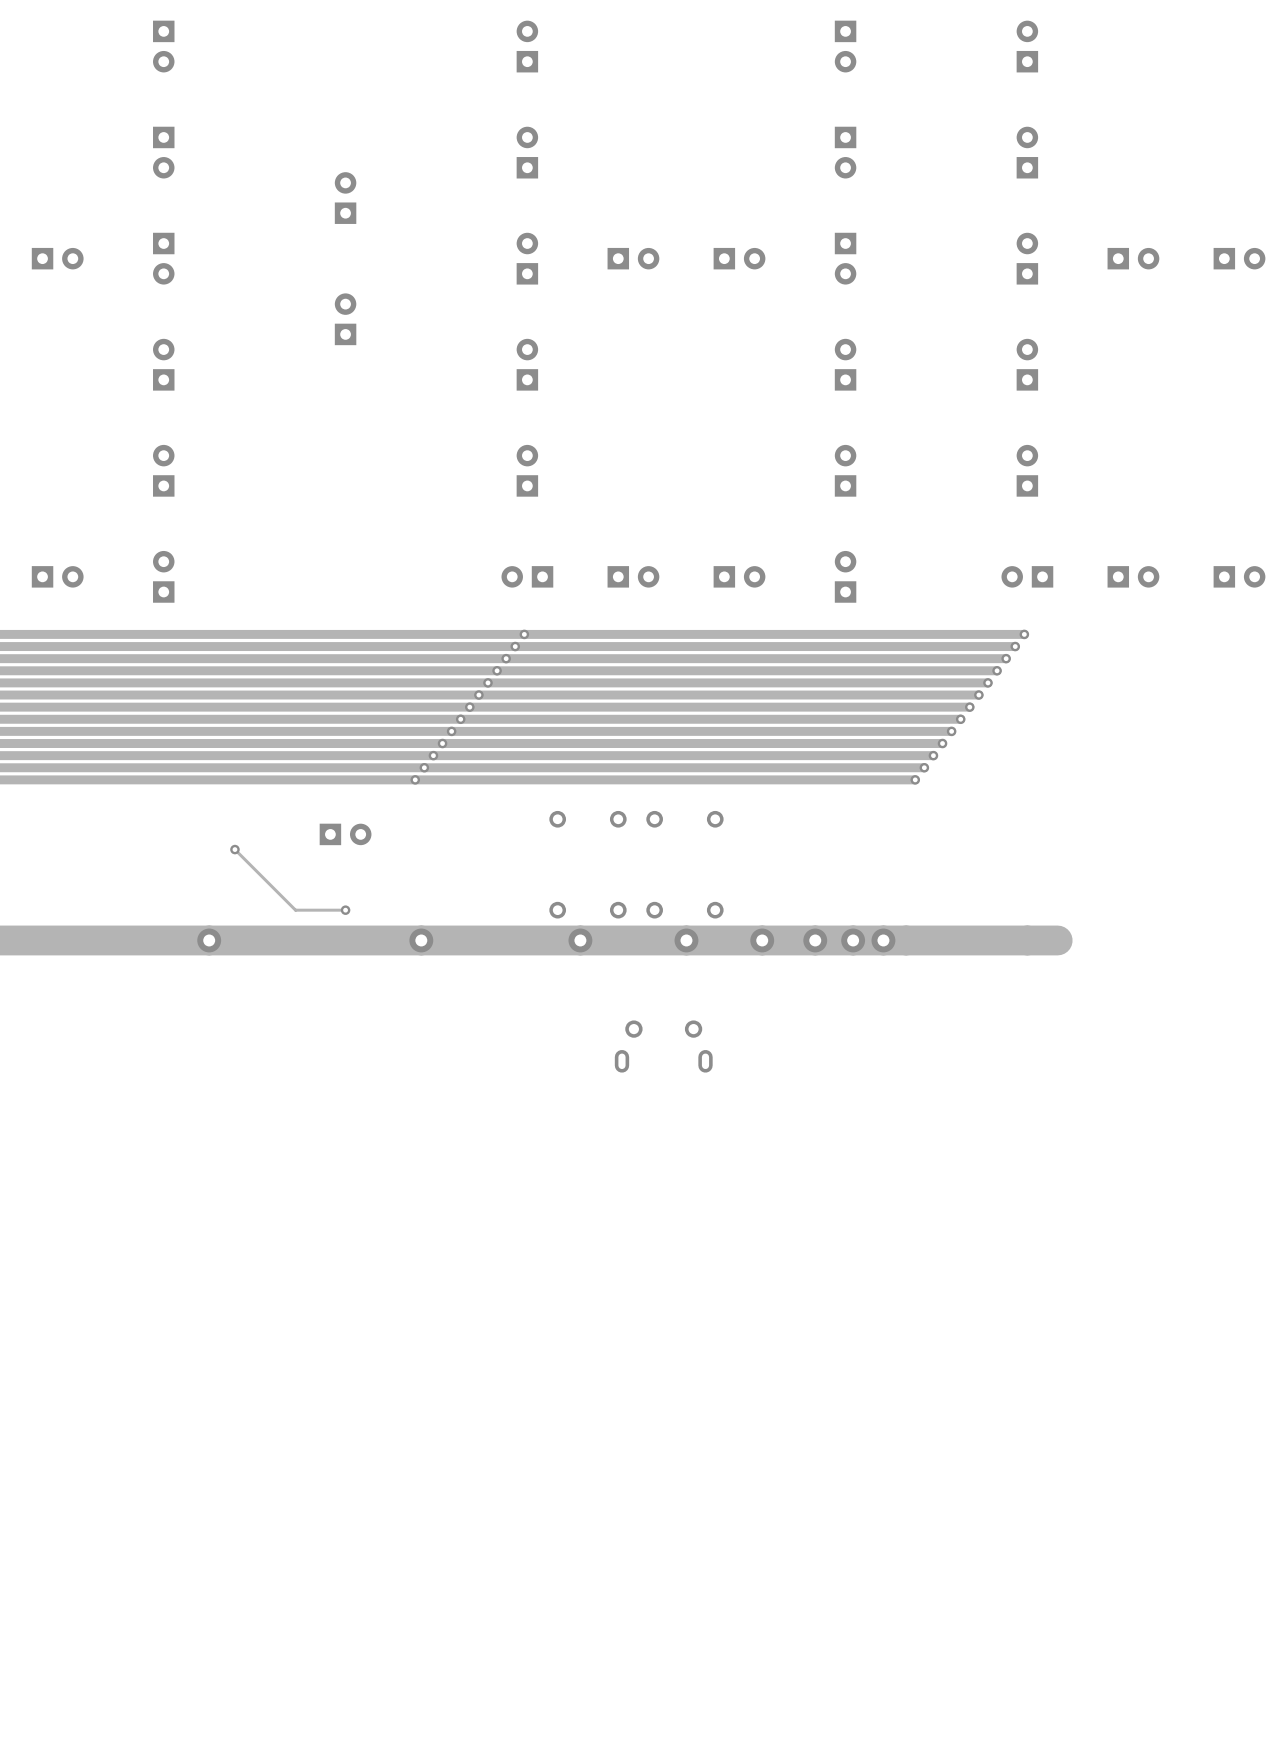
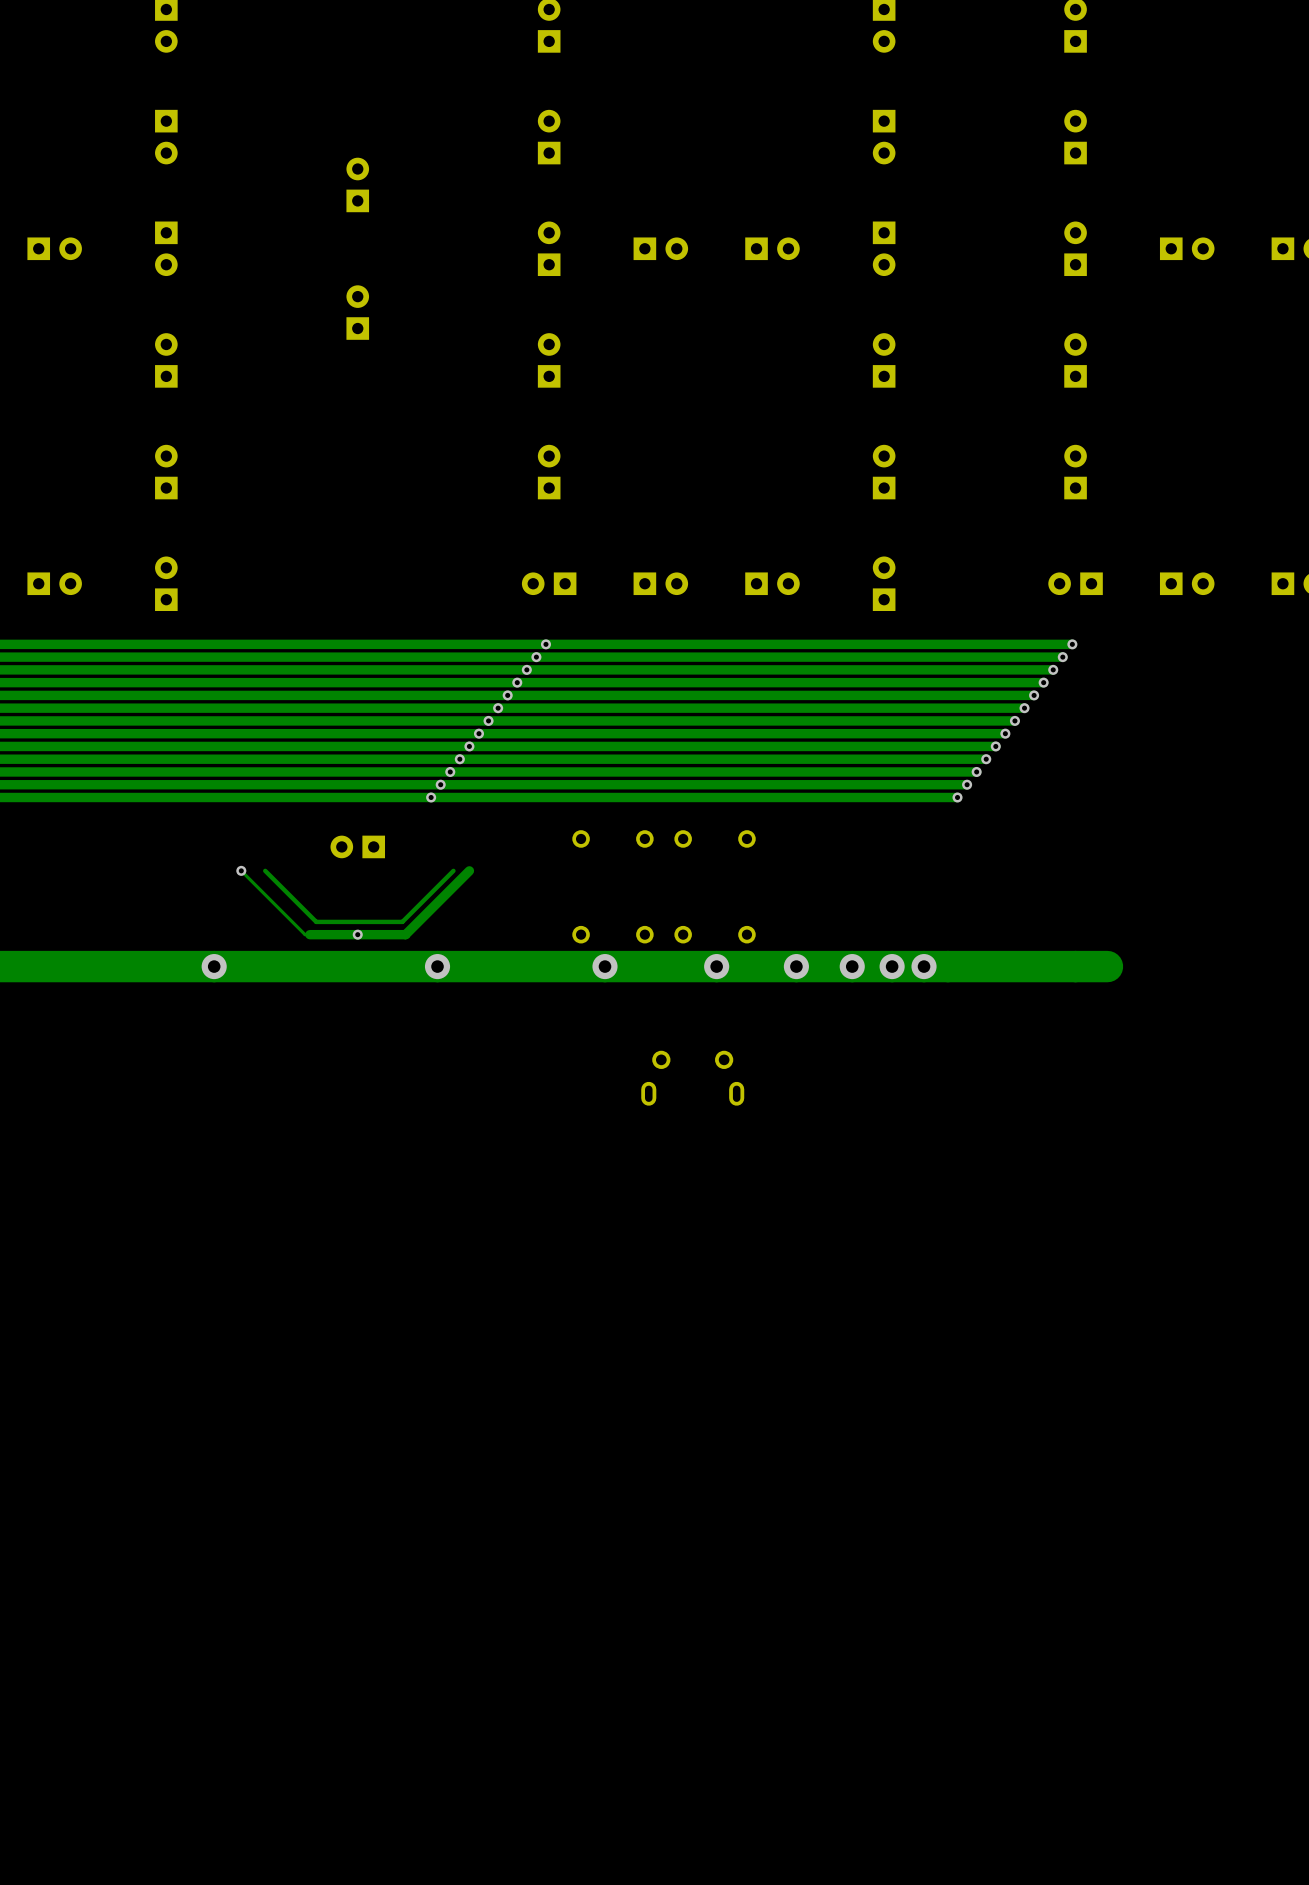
part rotation: 0° (345, 834) -> 180° (357, 846)
track: none -> (453, 870) (402, 921) (316, 921) (265, 870)
track: none -> (469, 870) (405, 934) (357, 934)
track width: thin (345, 910) (300, 910) -> thick (357, 934) (309, 934)

